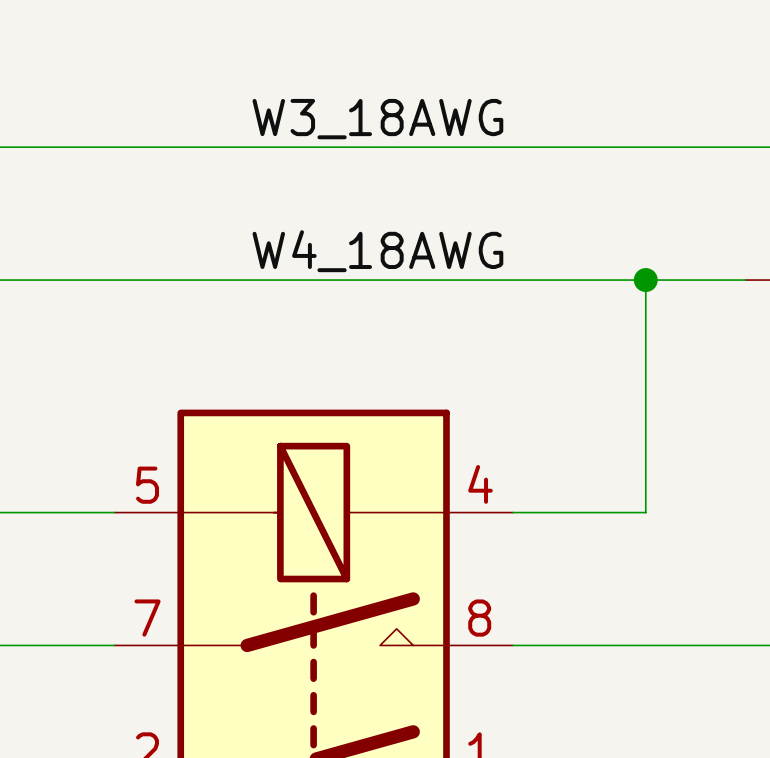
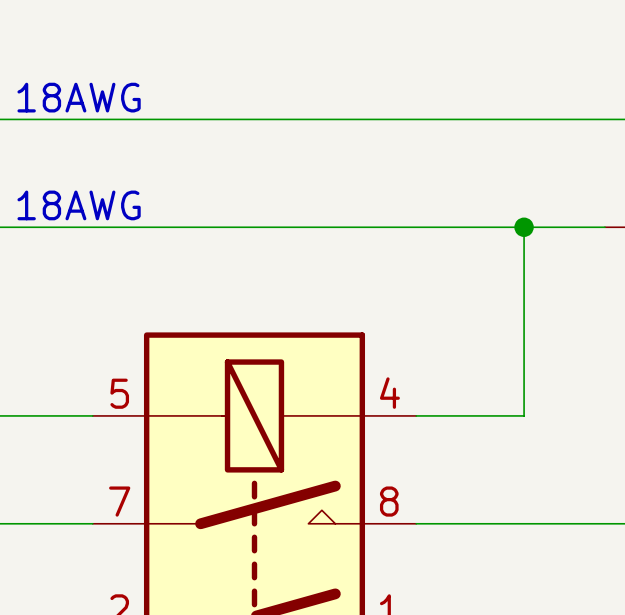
label: W3_18AWG (377, 119) -> none
text: none -> 18AWG (79, 97)
label: W4_18AWG (377, 251) -> none
text: none -> 18AWG (79, 205)

